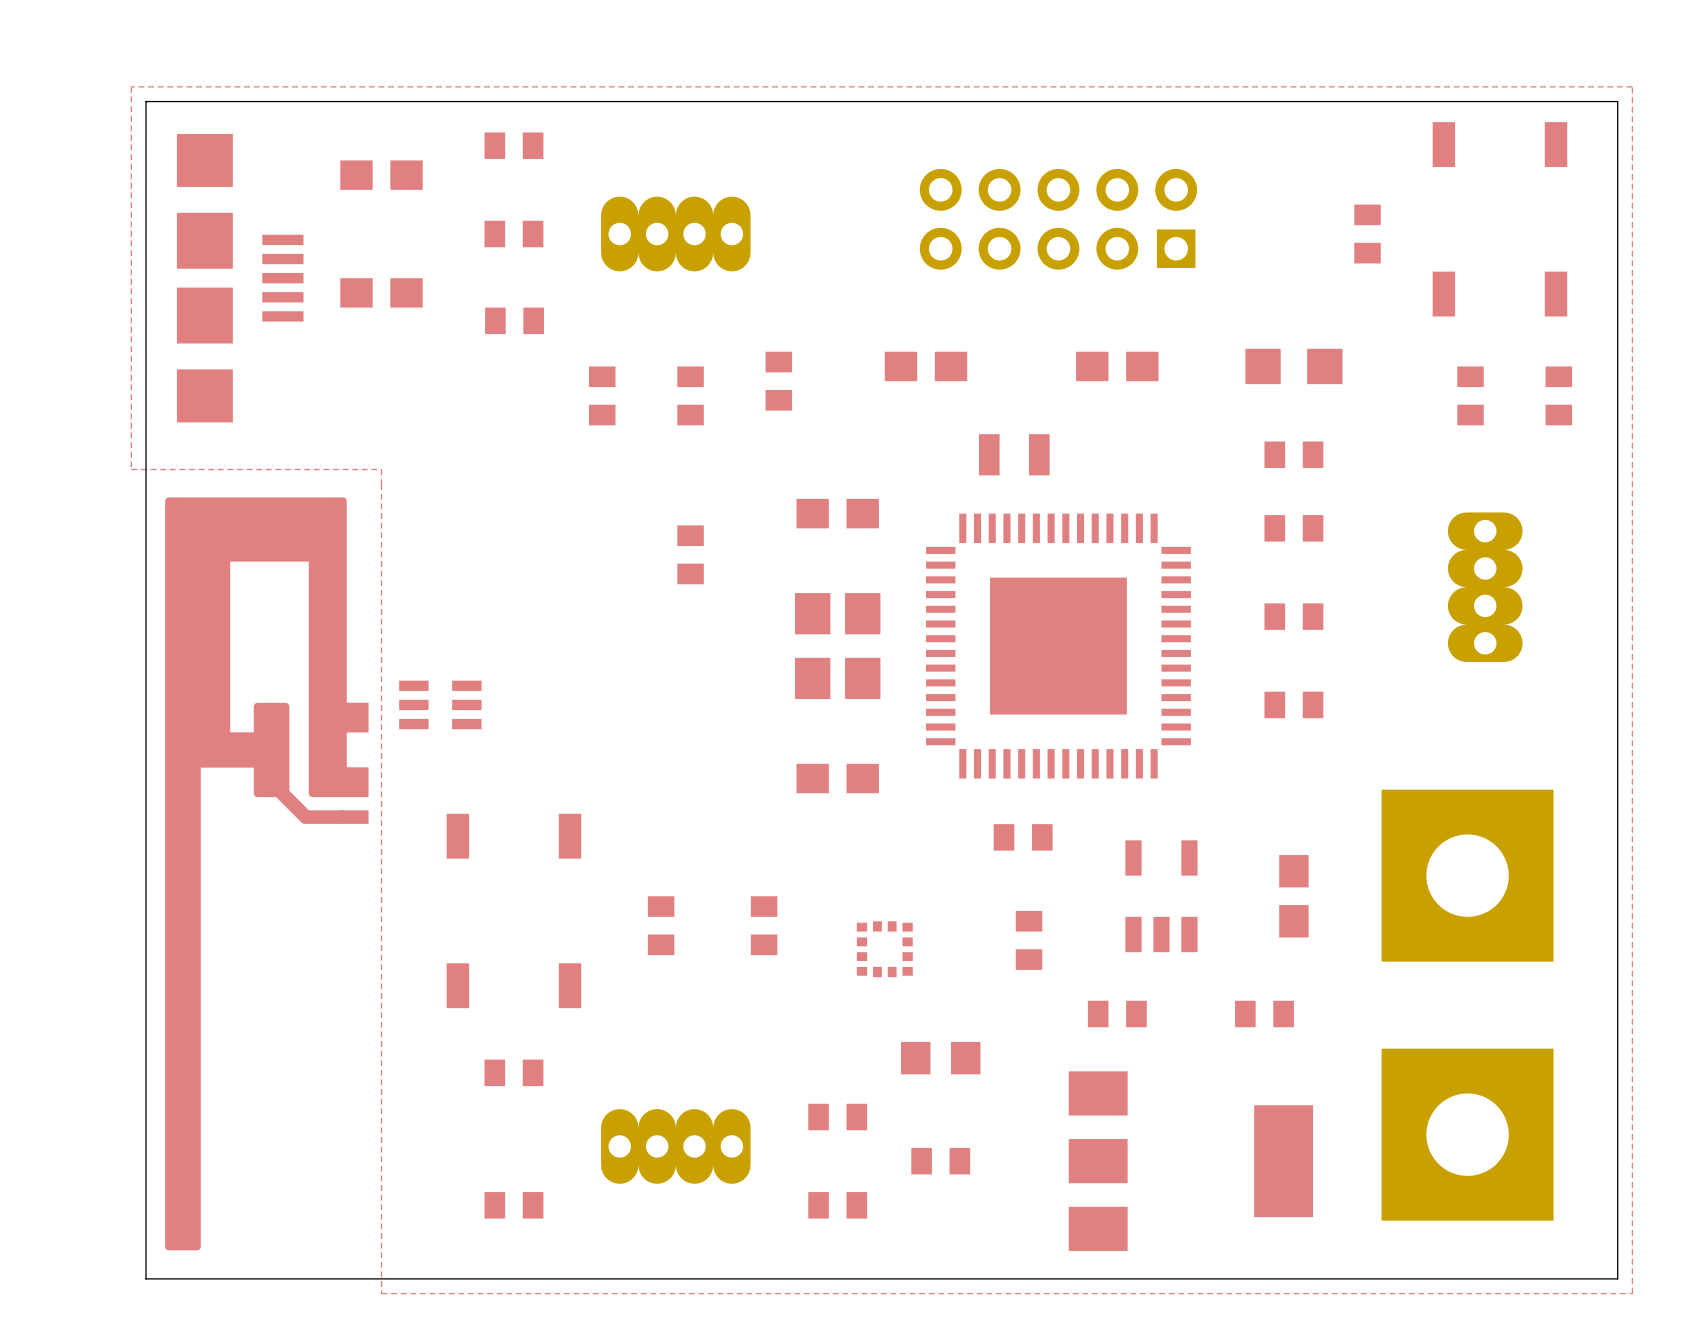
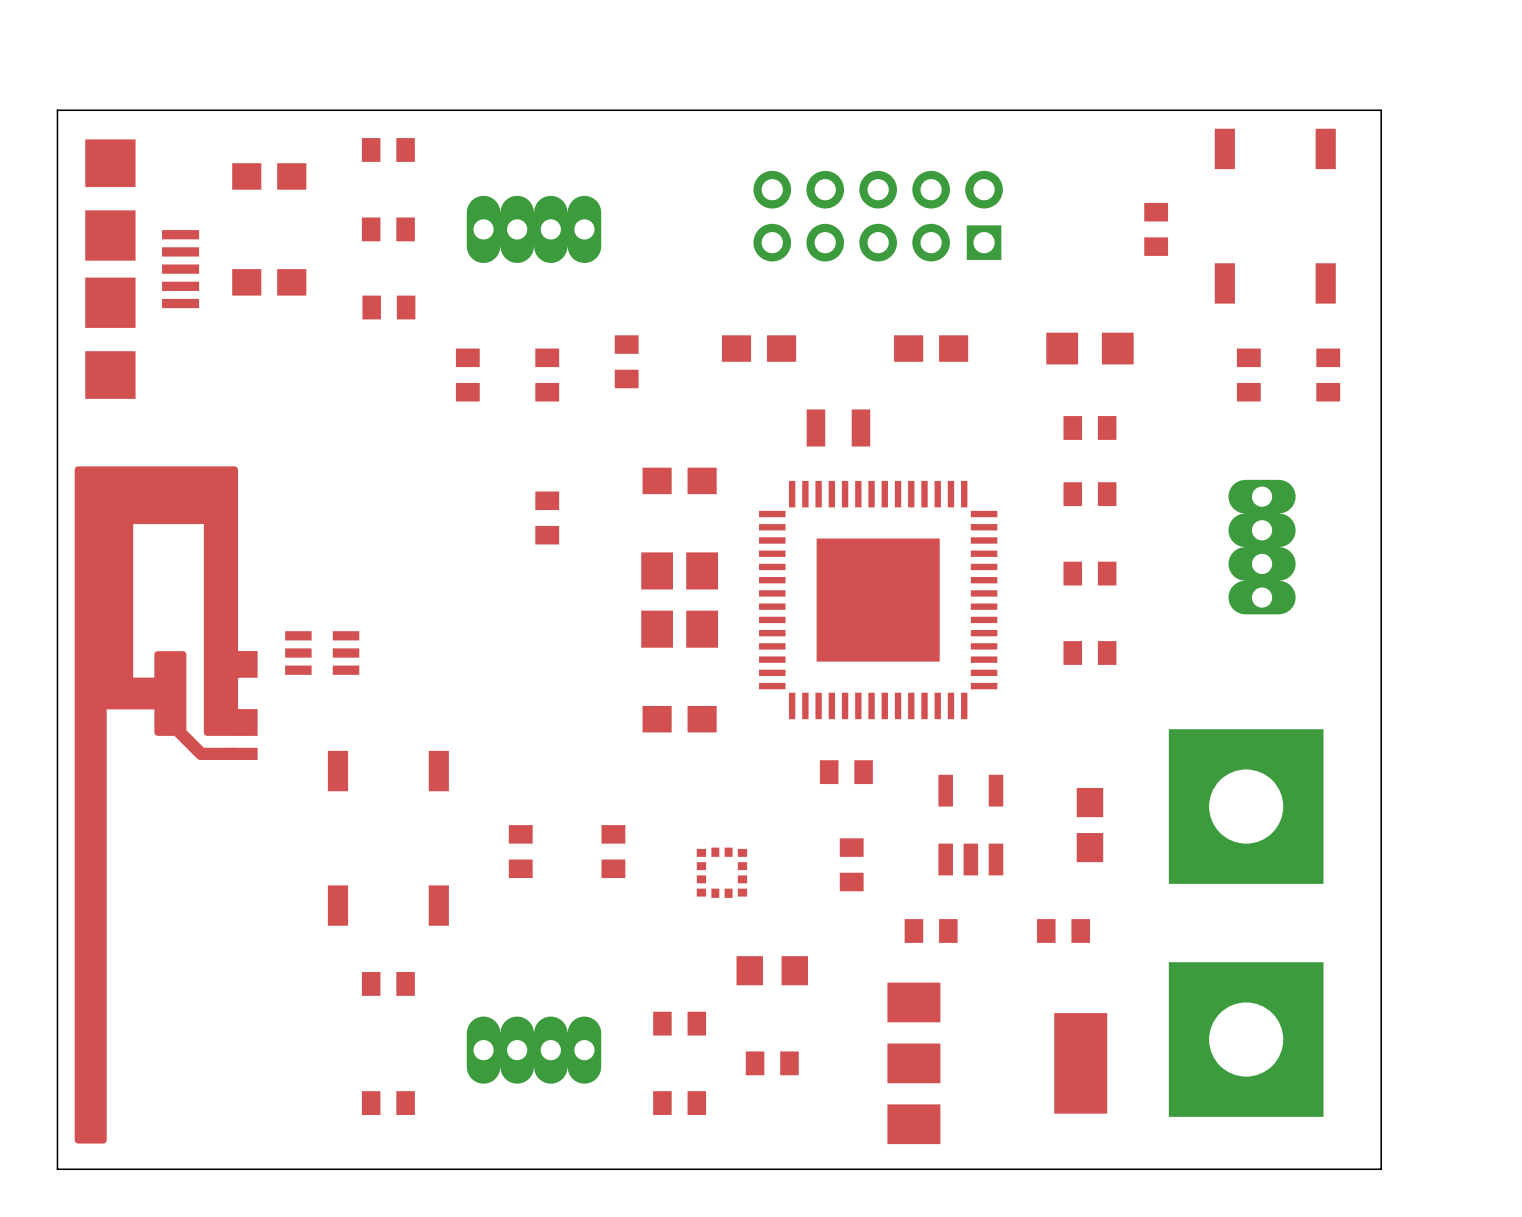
top zone outline: (1632, 86) (1632, 1293) (381, 1293) (381, 469) (131, 469) (131, 86) (1632, 86) -> none

